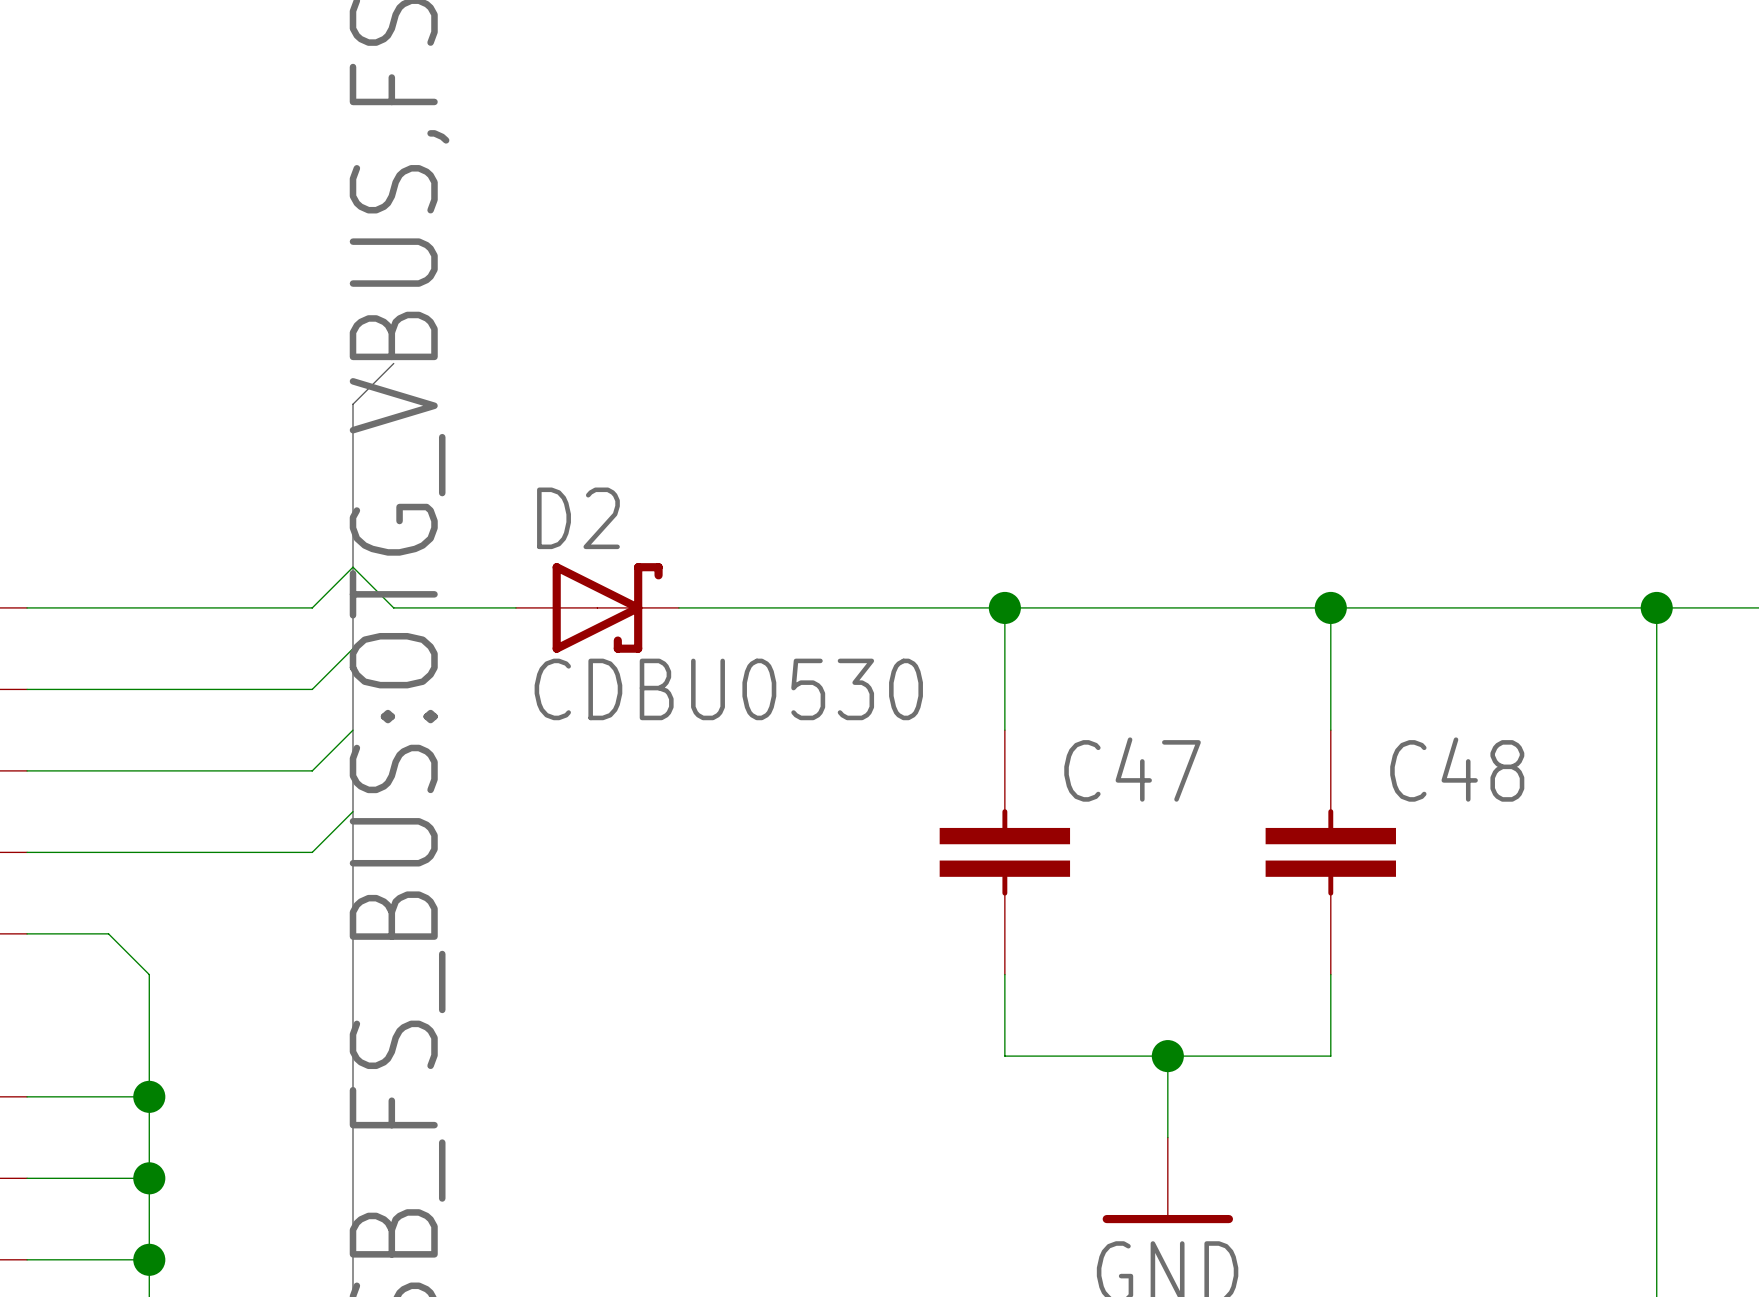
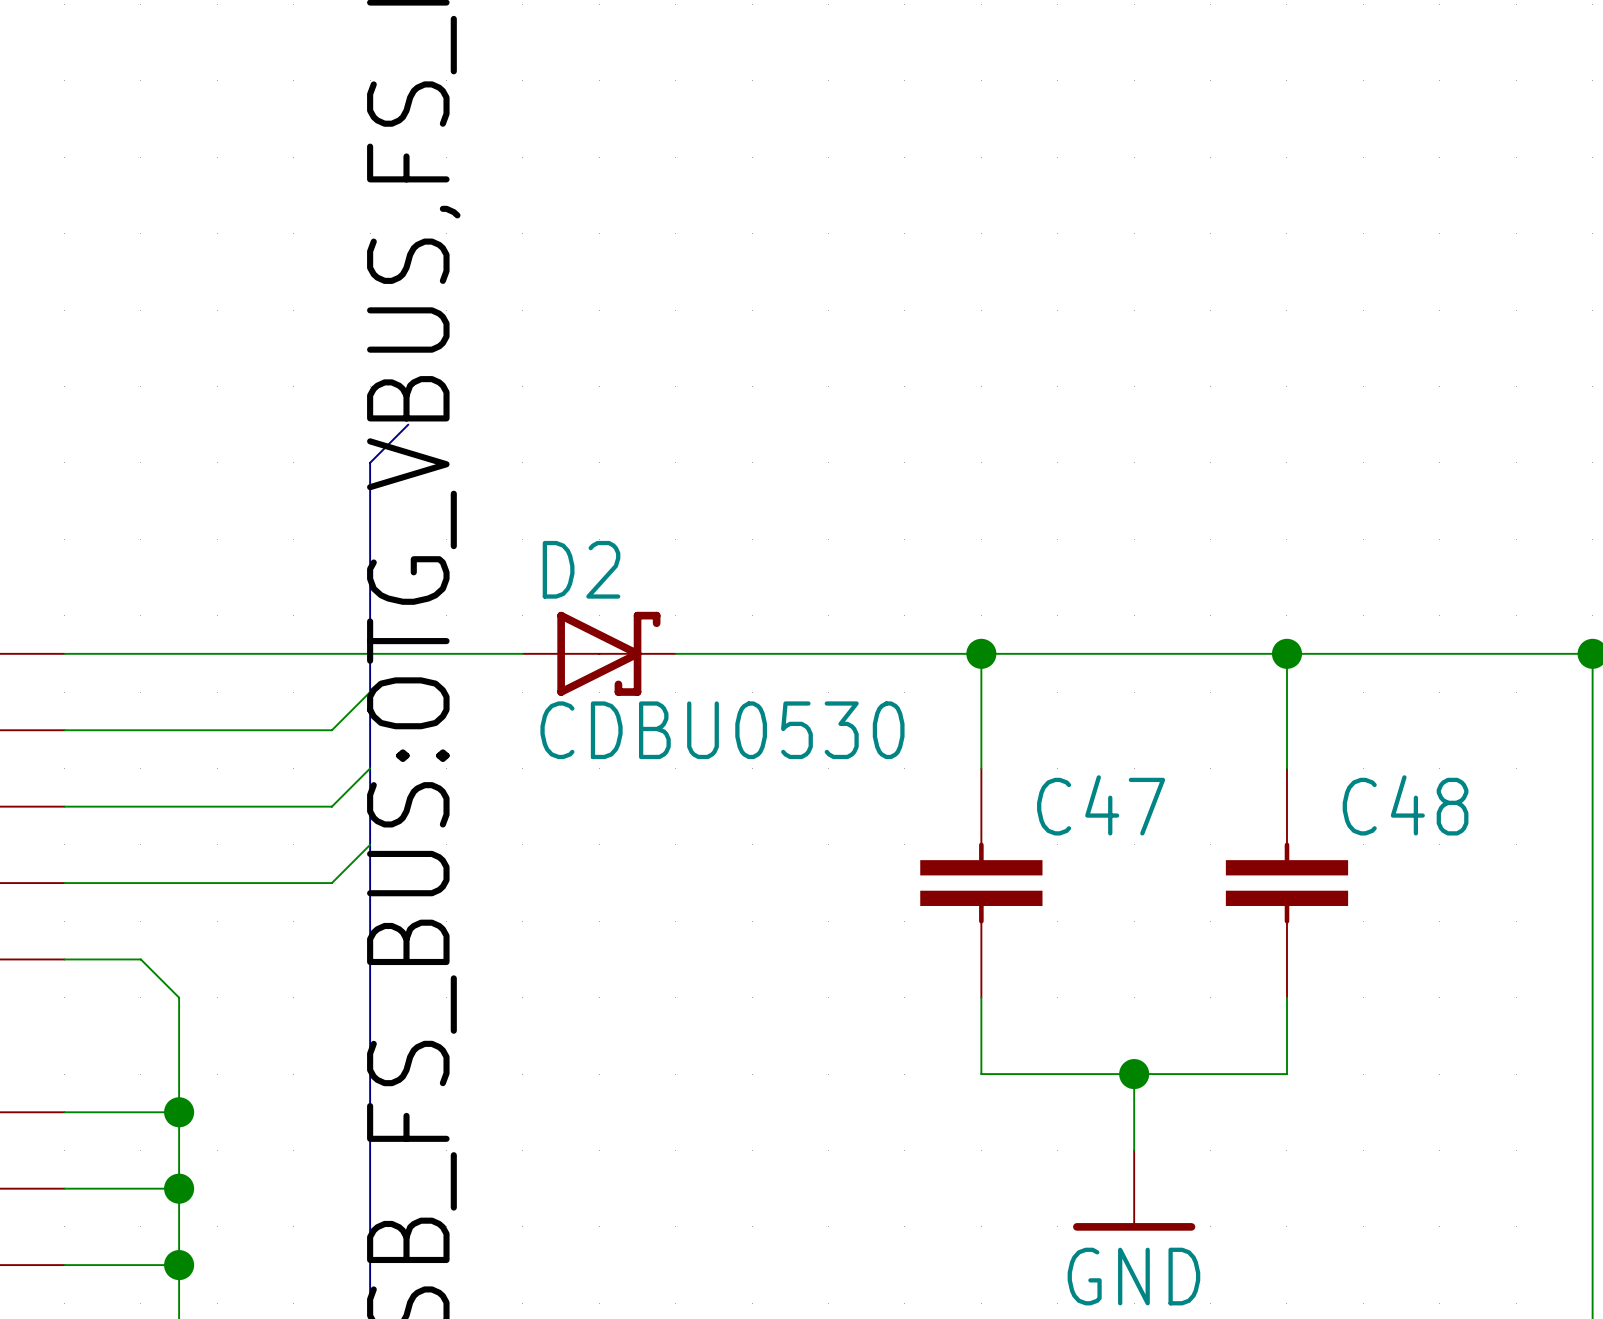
wire: (312, 607) (353, 567) (393, 607) -> (331, 653) (408, 653)

